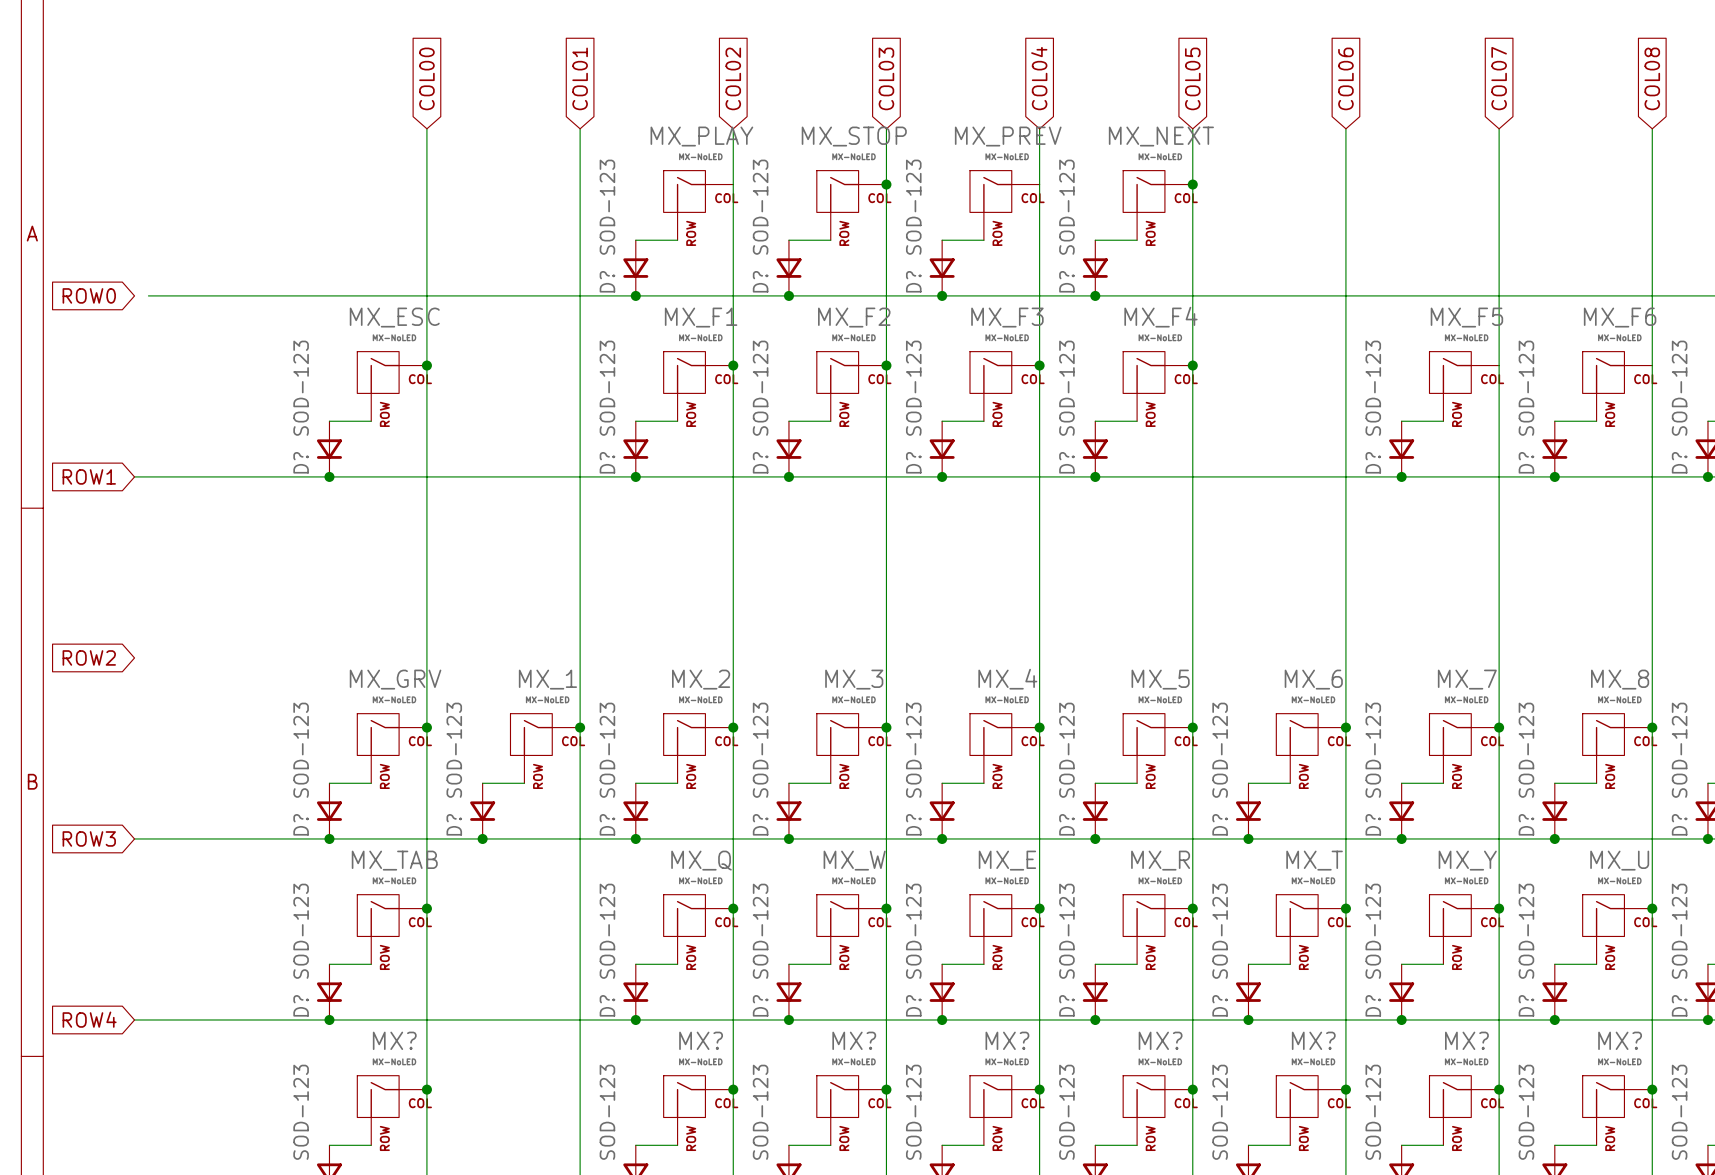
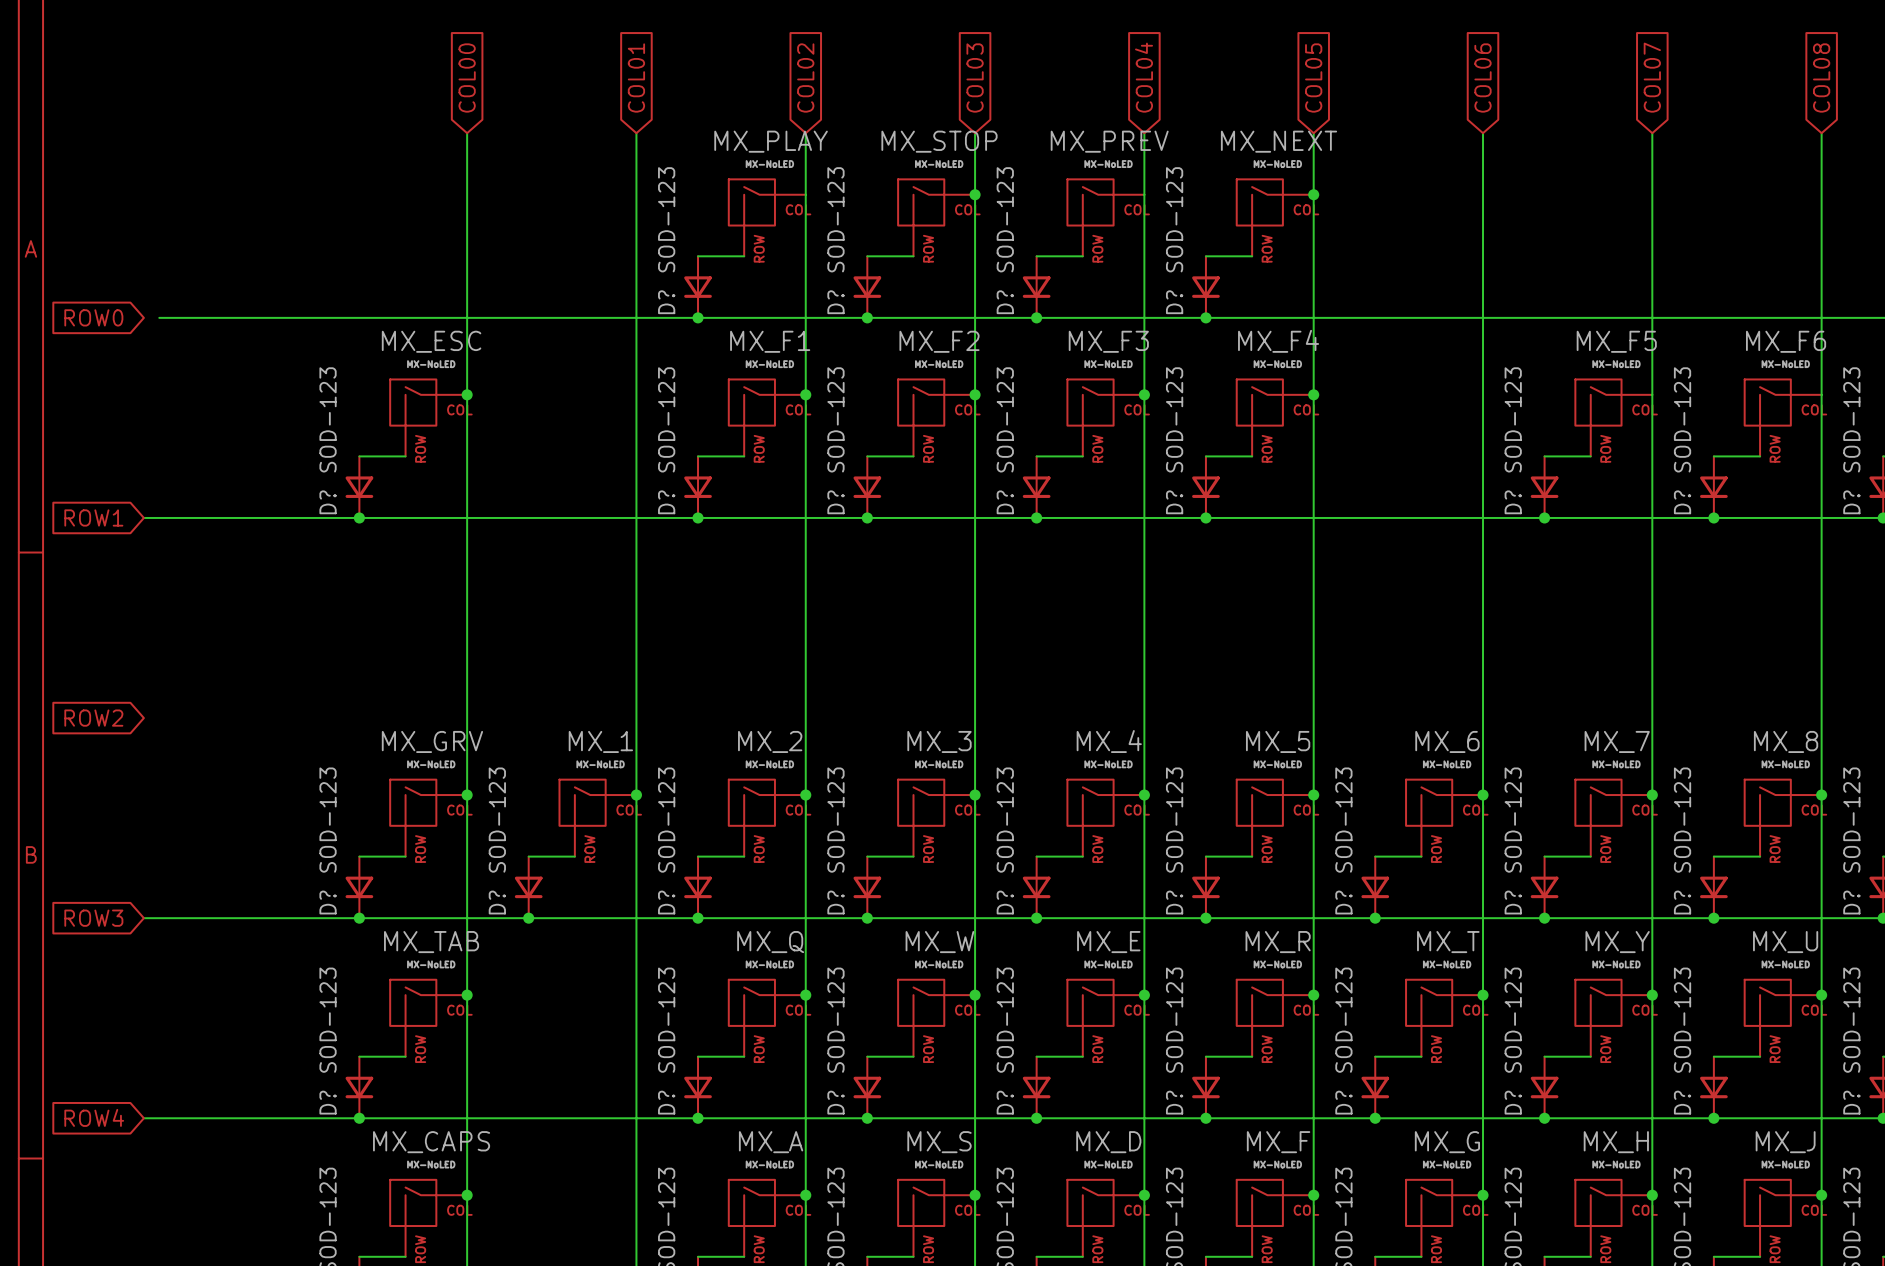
MX? name: MX? (394, 1040) -> MX_CAPS (431, 1142)
MX? name: MX? (701, 1040) -> MX_A (771, 1142)
MX? name: MX? (854, 1040) -> MX_S (939, 1142)
MX? name: MX? (1007, 1040) -> MX_D (1108, 1142)
MX? name: MX? (1160, 1040) -> MX_F (1278, 1142)
MX? name: MX? (1313, 1040) -> MX_G (1447, 1142)
MX? name: MX? (1466, 1040) -> MX_H (1616, 1142)
MX? name: MX? (1620, 1040) -> MX_J (1785, 1142)

